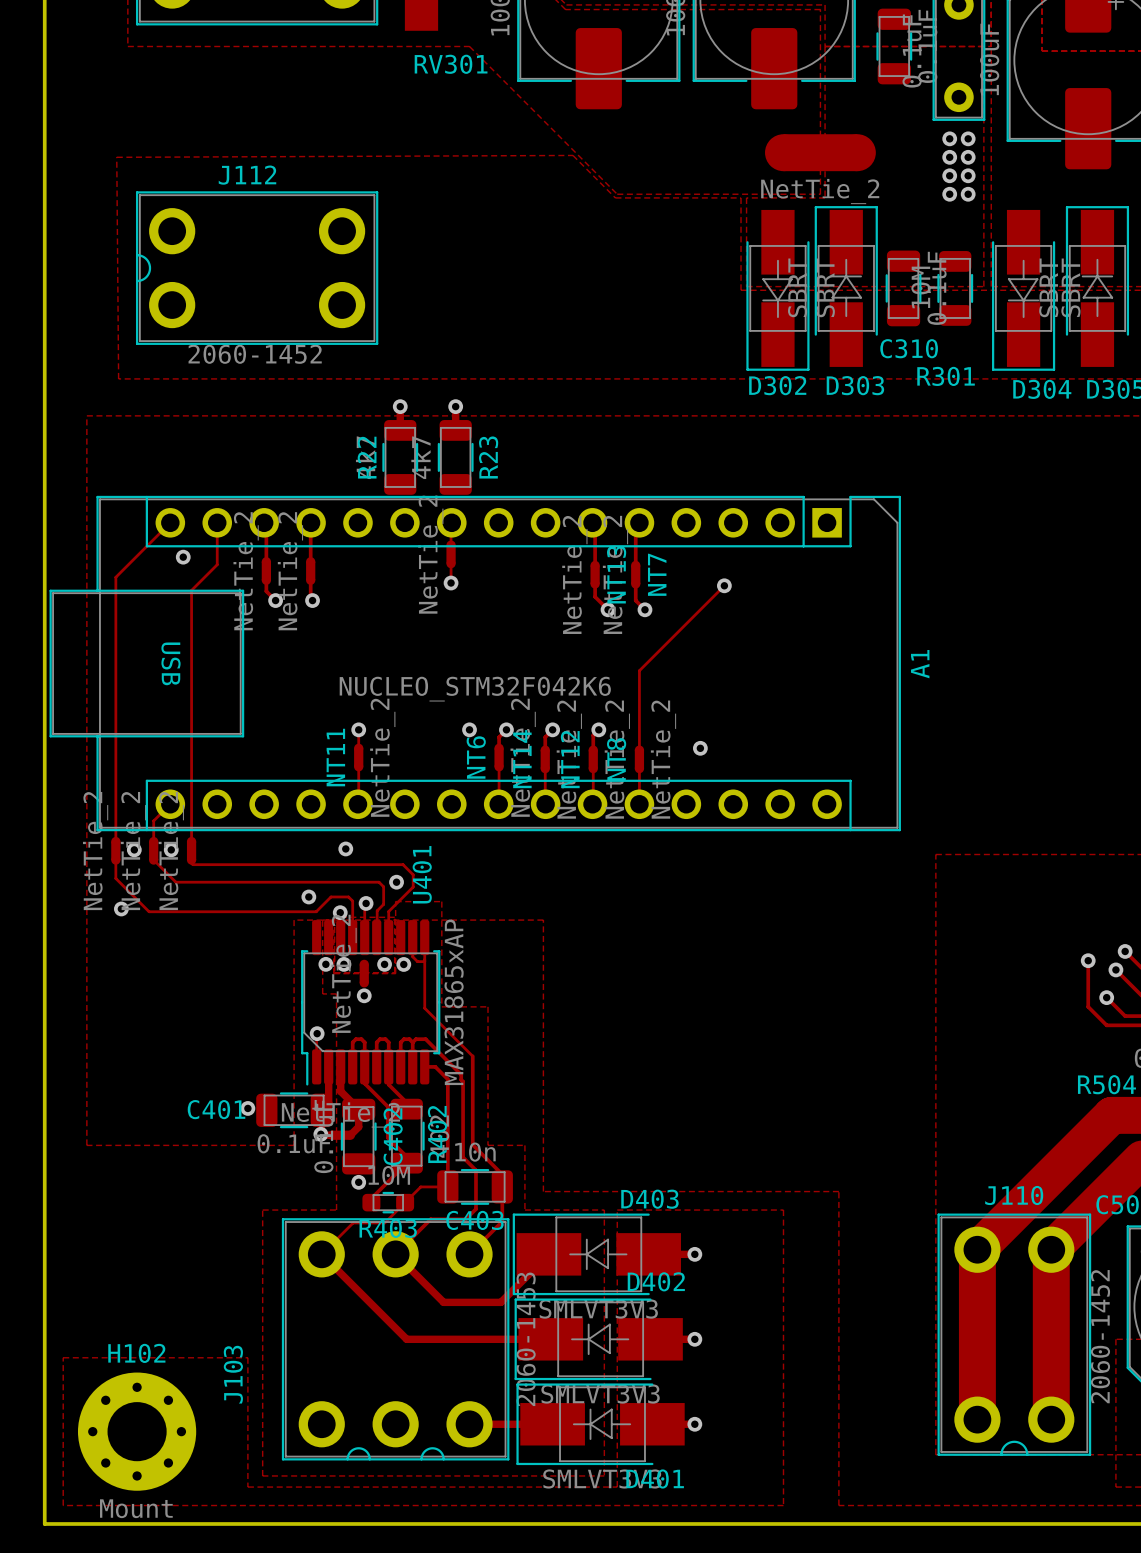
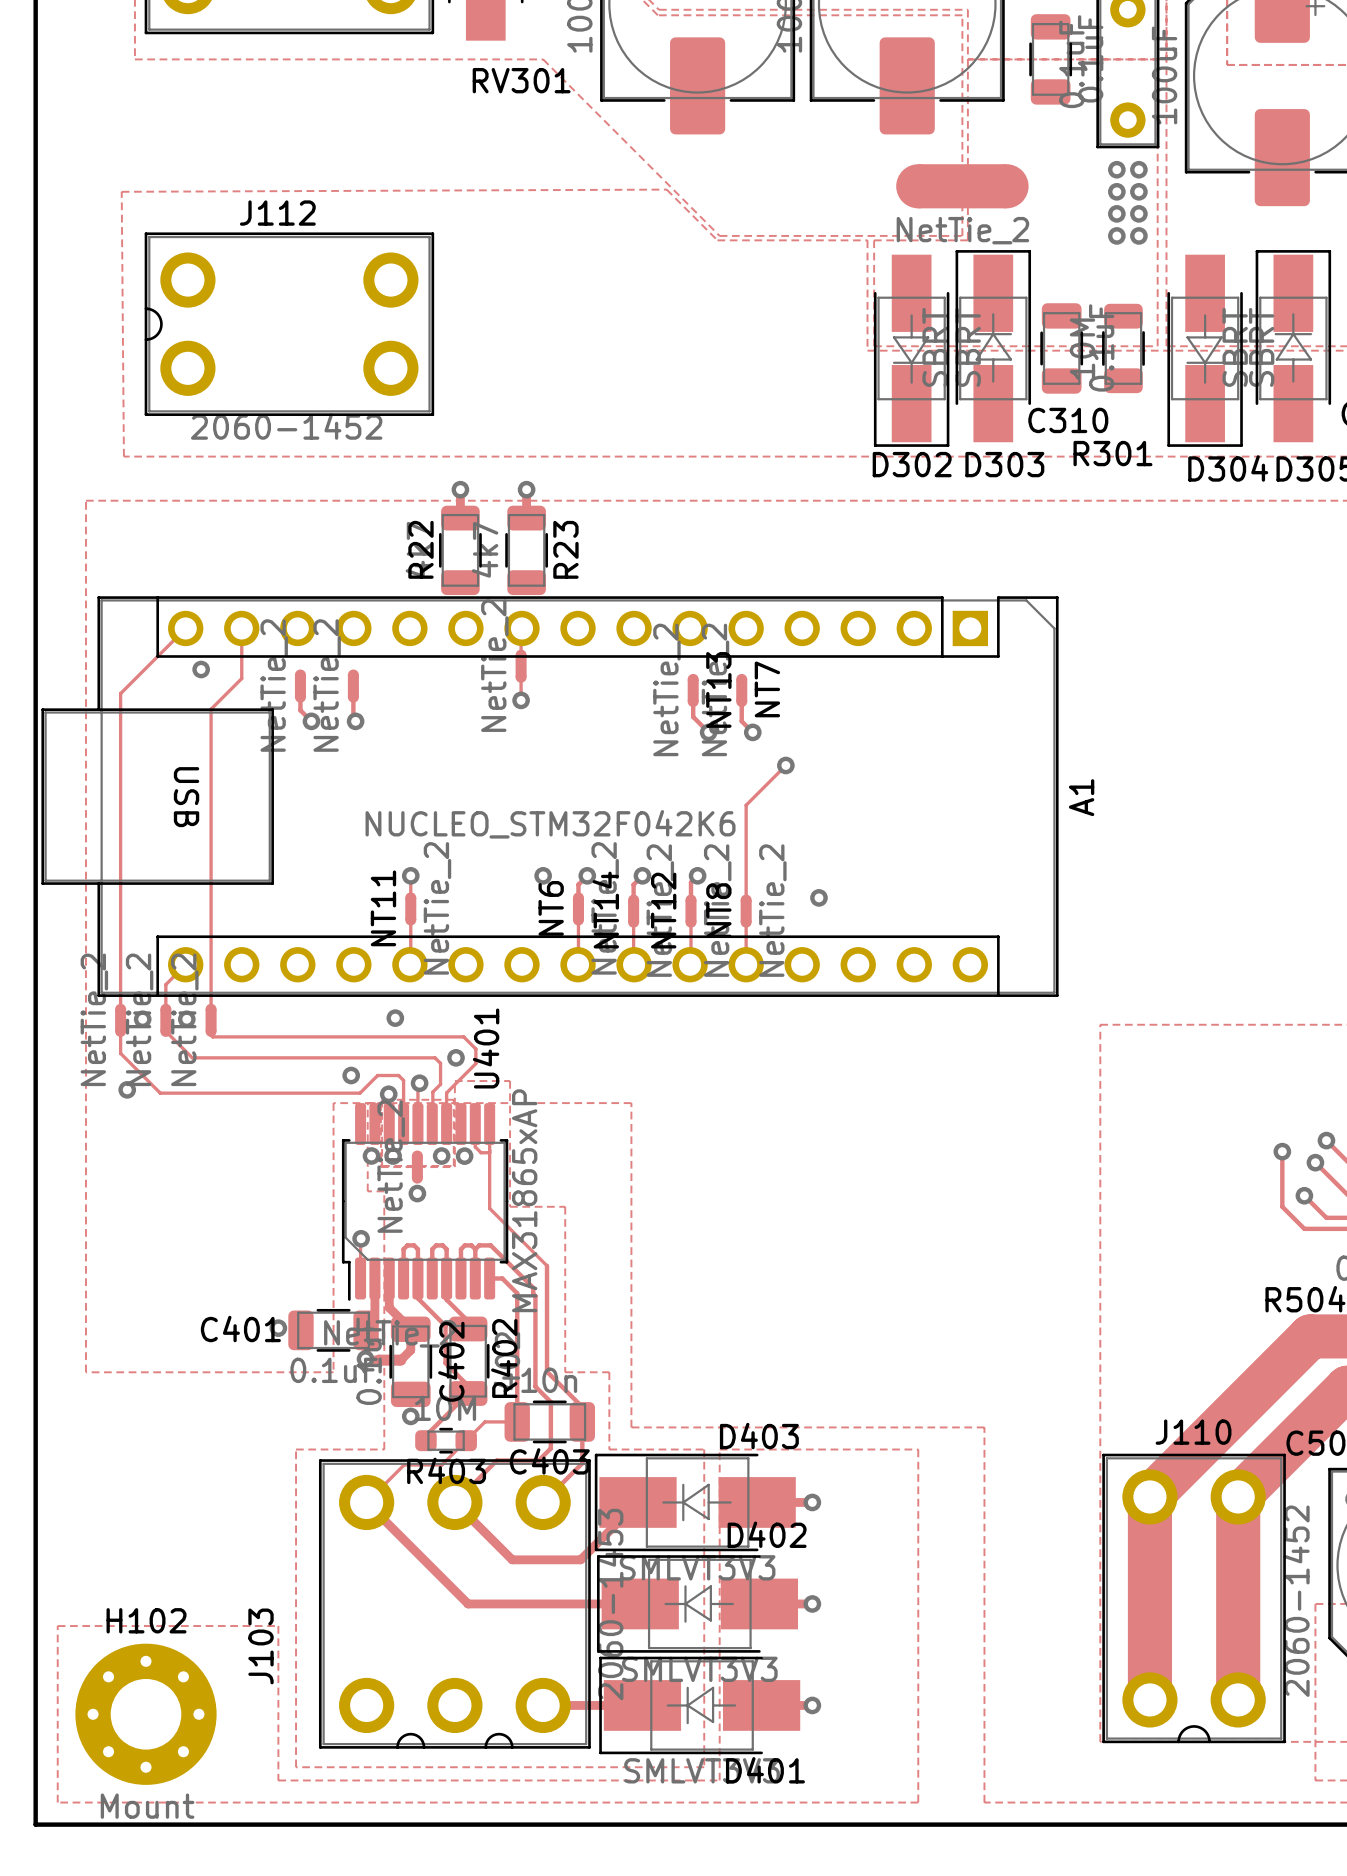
track: (264, 522) (266, 525) (266, 561) -> none
track: (311, 522) (310, 561) -> none
track: (592, 522) (595, 525) (595, 565) -> none
track: (639, 522) (635, 526) (635, 565) -> none
track: (724, 585) (672, 637) -> none
via position: (724, 585) -> (785, 765)

